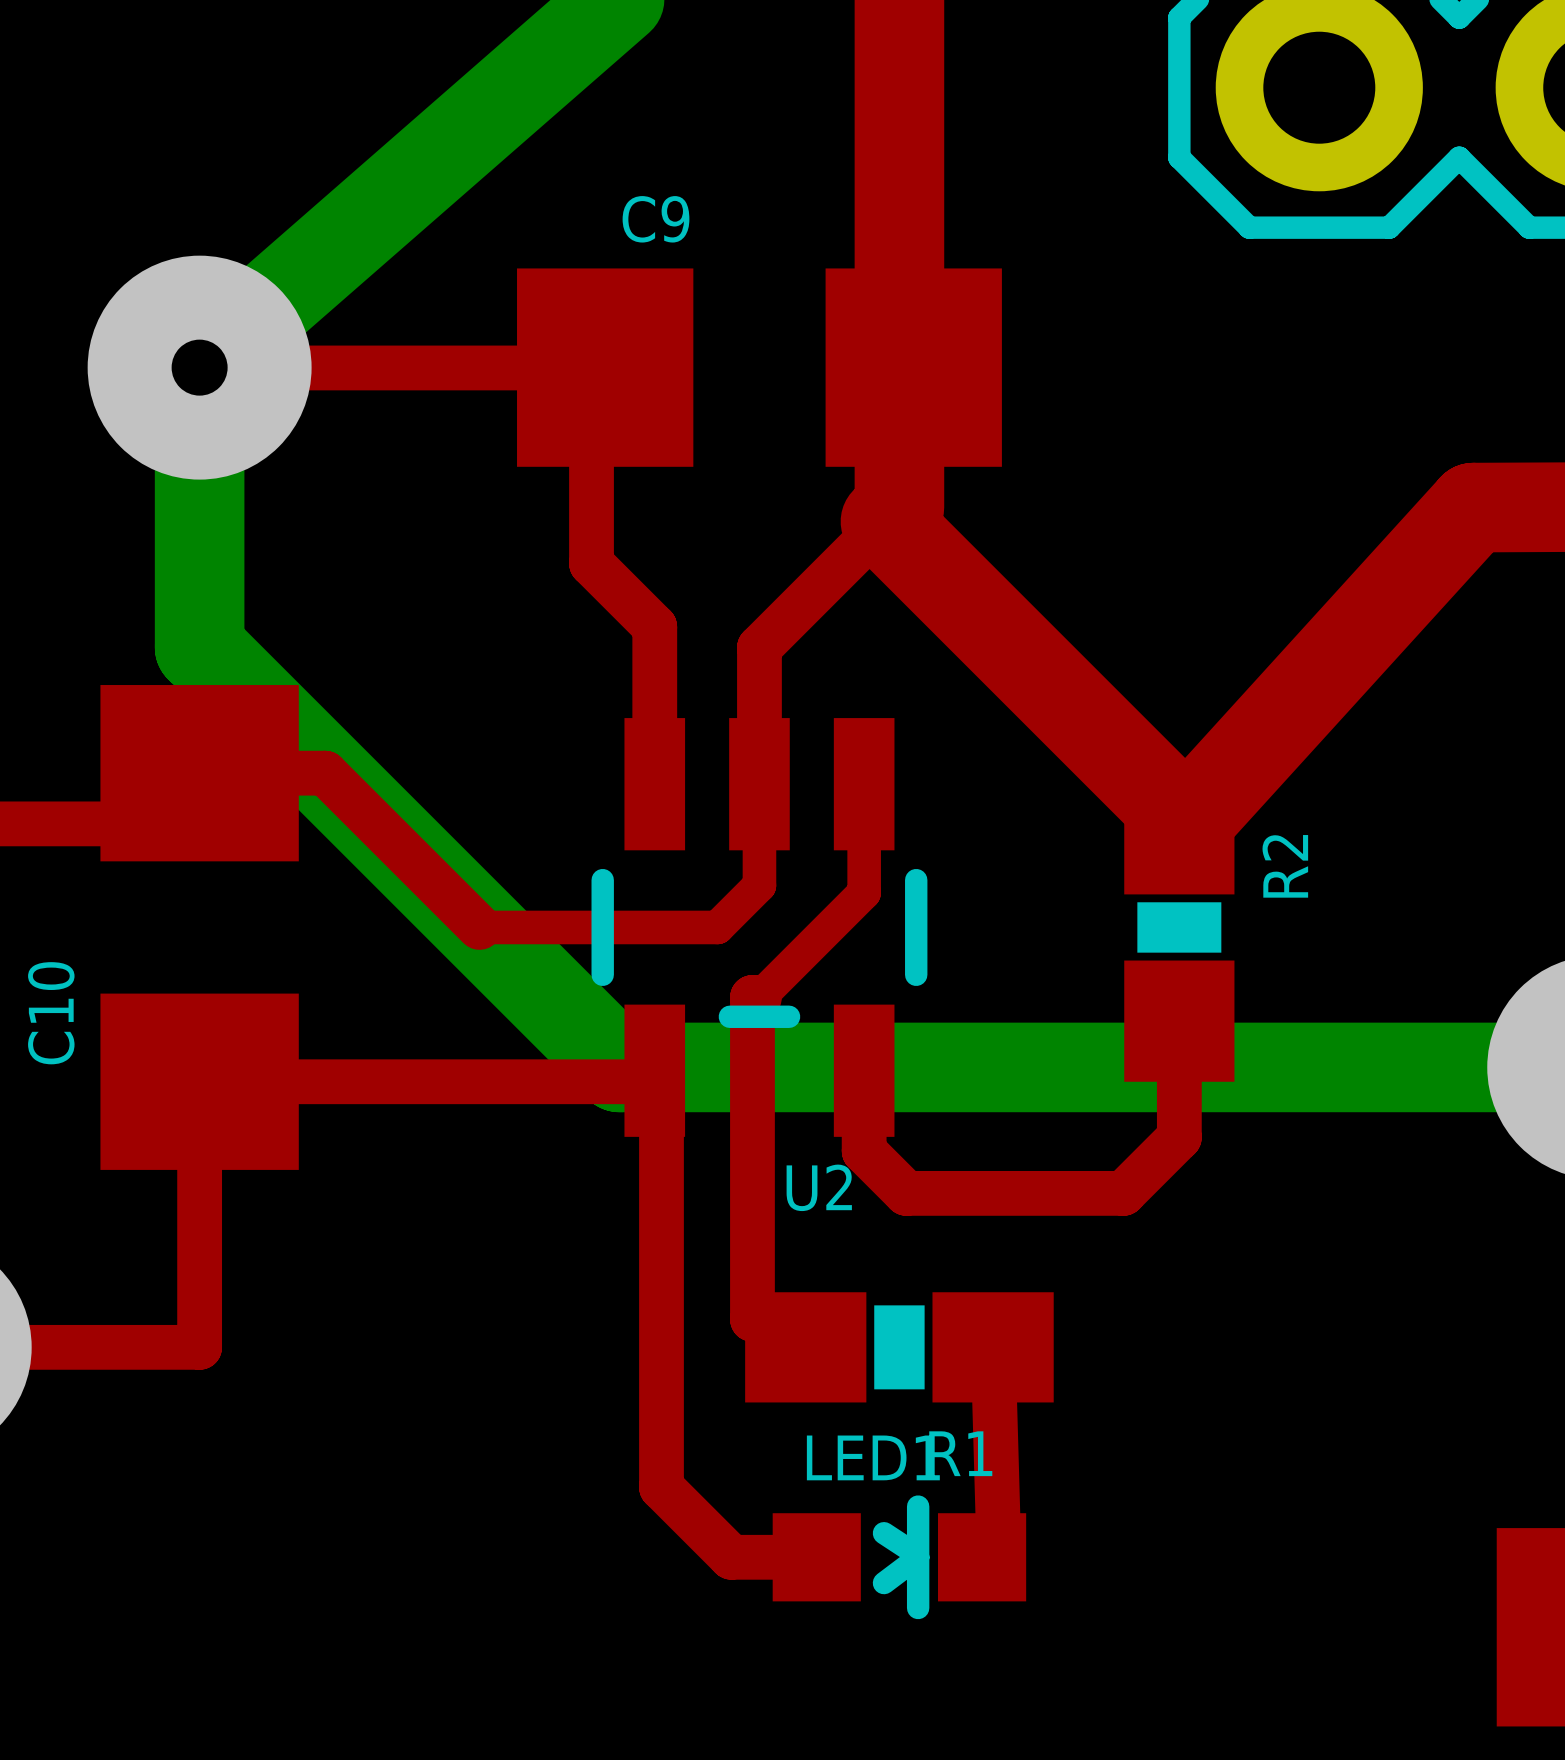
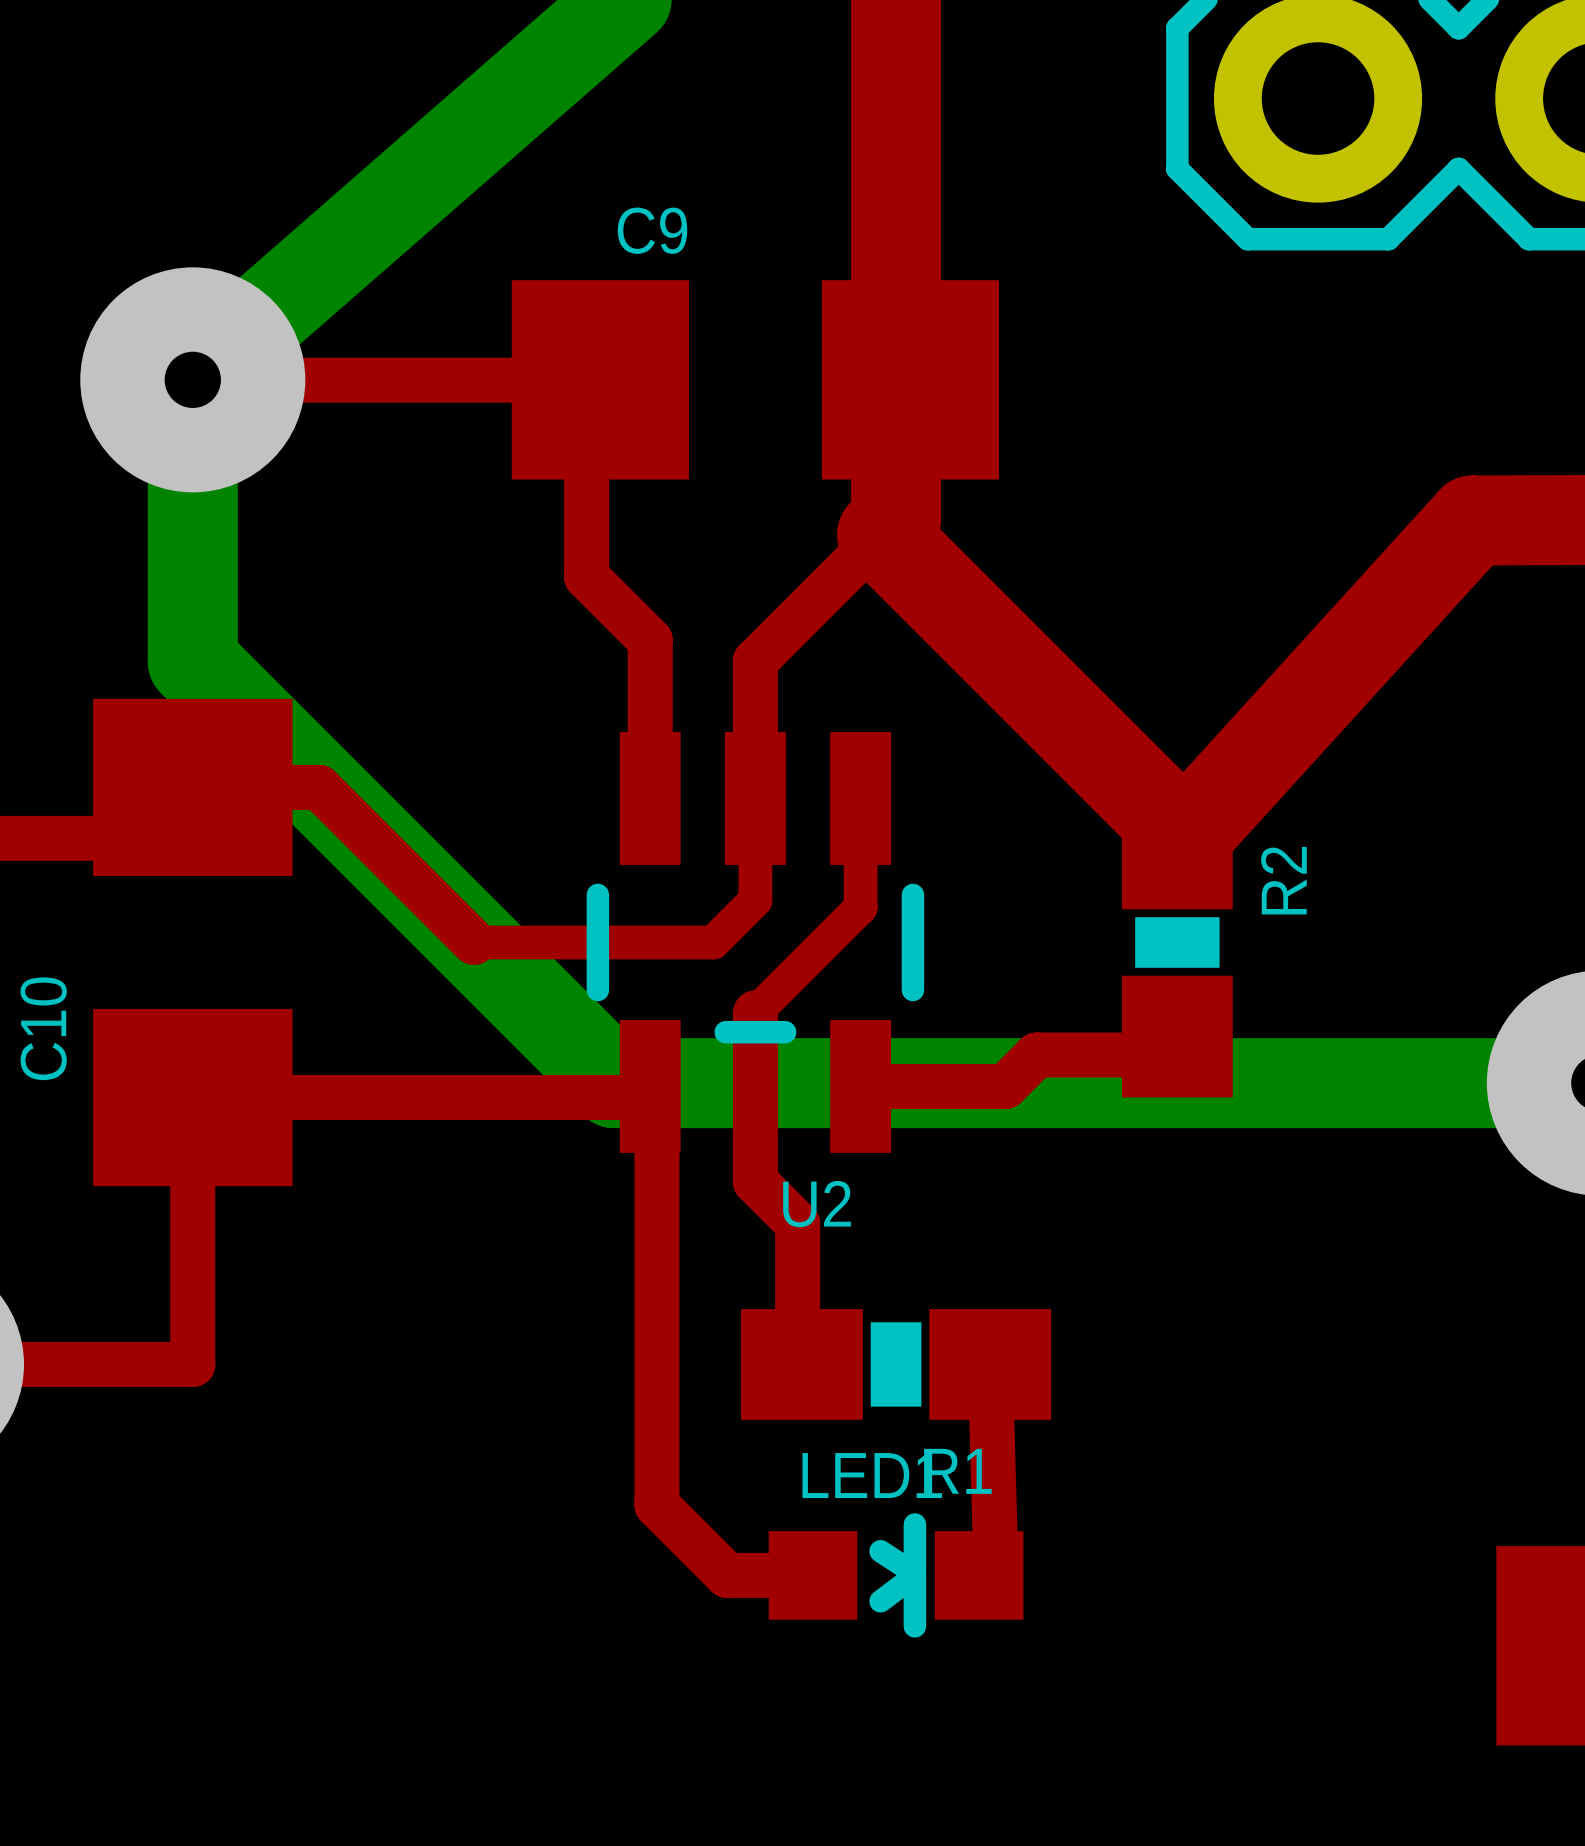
top track: (759, 997) (752, 997) (752, 1319) (805, 1319) (805, 1347) -> (755, 1012) (755, 1181) (797, 1223) (797, 1363)
top track: (1179, 1021) (1179, 1137) (1123, 1193) (906, 1193) (864, 1151) (864, 1070) -> (1177, 1036) (1164, 1055) (1036, 1055) (1005, 1086) (860, 1086)

